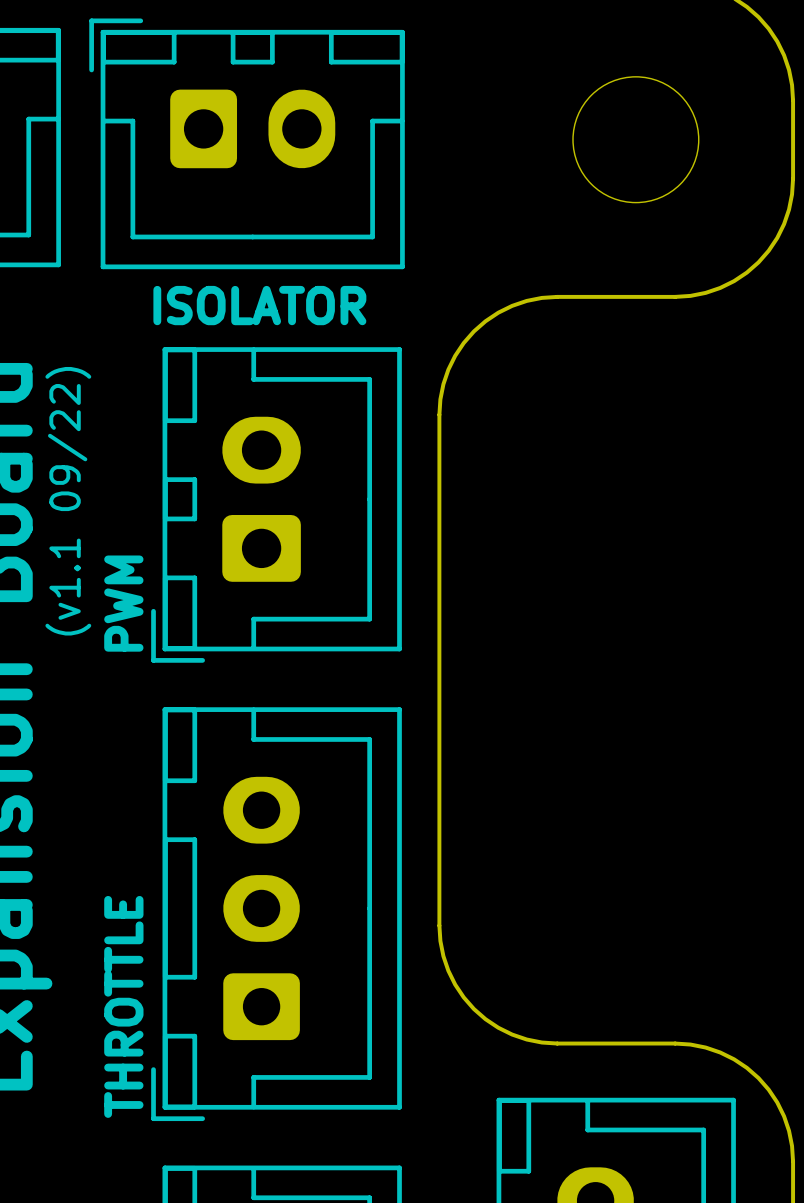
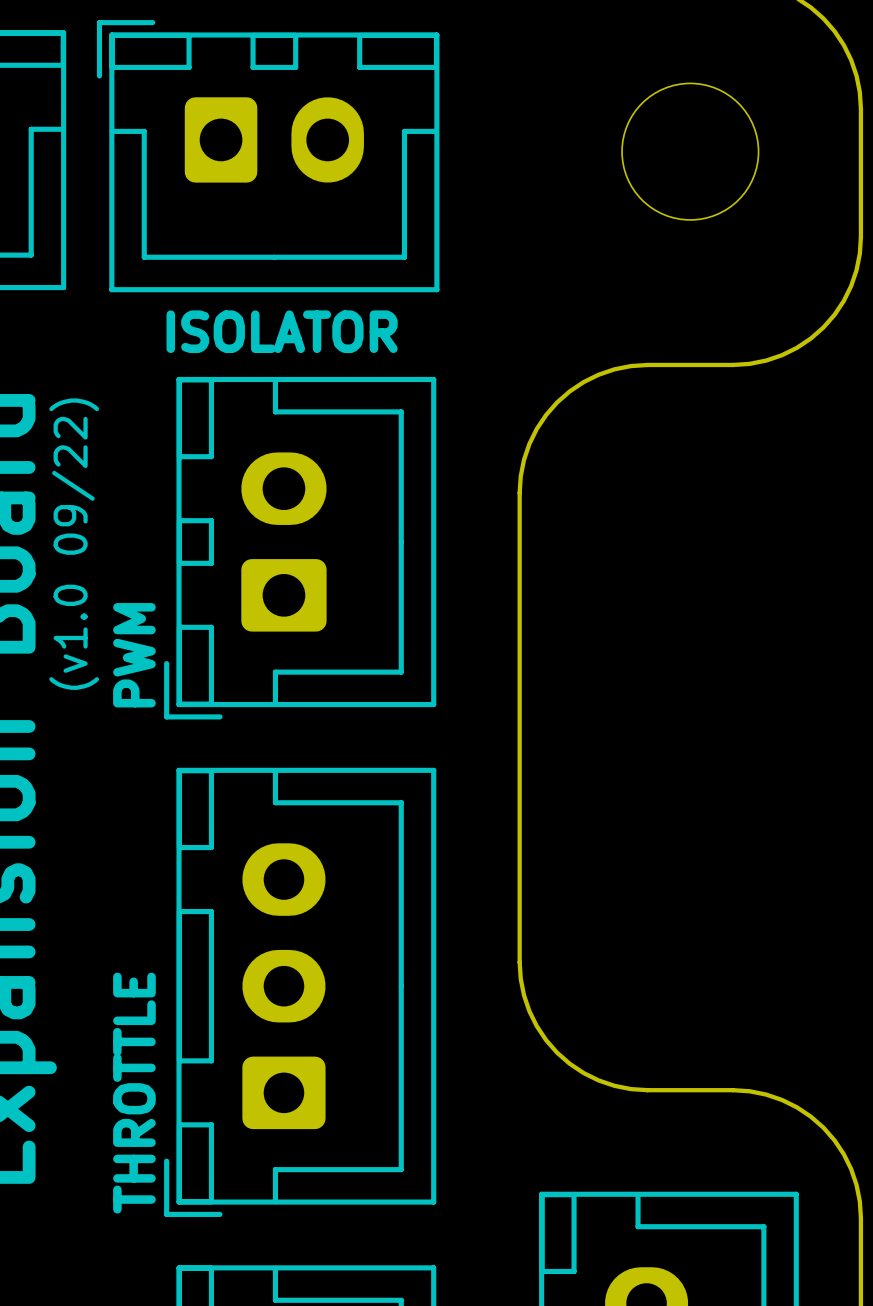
board edge: (793, 179) (789, 209) (784, 224) (768, 250) (746, 272) (720, 287) (705, 292) (675, 296) (541, 297) (526, 300) (498, 312) (473, 331) (455, 355) (443, 384) (439, 414) (439, 925) (443, 956) (448, 970) (463, 997) (485, 1019) (512, 1034) (526, 1039) (557, 1043) (690, 1044) (705, 1047) (734, 1059) (758, 1078) (777, 1102) (789, 1130) (793, 1161) -> (860, 194) (859, 253) (851, 285) (834, 314) (810, 338) (781, 355) (749, 363) (630, 366) (598, 374) (583, 382) (557, 402) (536, 428) (524, 459) (519, 492) (519, 962) (520, 978) (529, 1011) (536, 1026) (557, 1052) (583, 1073) (598, 1080) (630, 1089) (749, 1091) (781, 1099) (810, 1116) (834, 1140) (851, 1169) (859, 1201) (860, 1260)
text: (v1.1 09/22) (68, 501) -> (v1.0 09/22) (74, 544)

